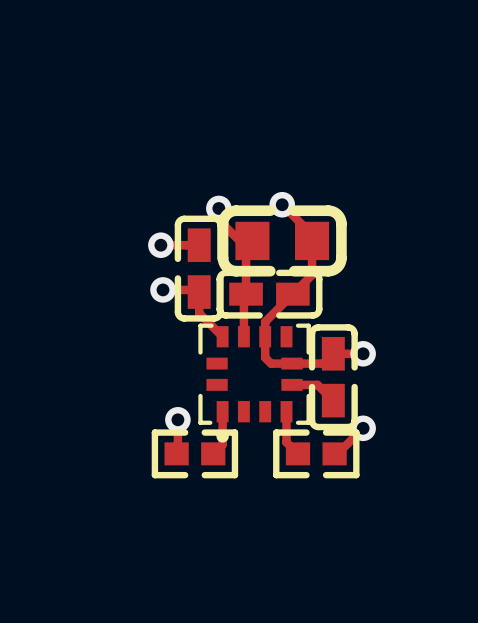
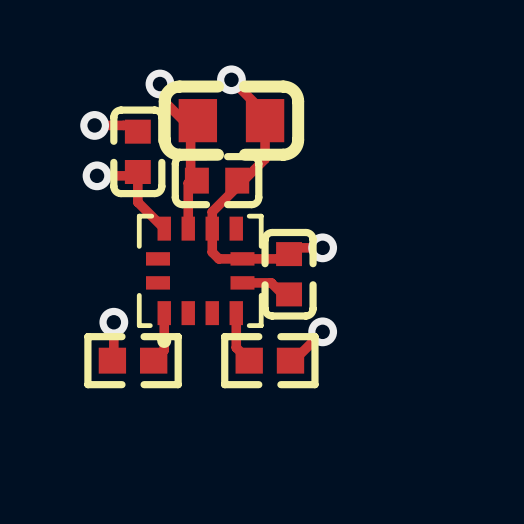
part footprint: [174, 215, 224, 322] -> [110, 106, 166, 198]
part footprint: [216, 269, 323, 319] -> [171, 153, 263, 209]
part footprint: [308, 324, 358, 431] -> [261, 228, 317, 320]

